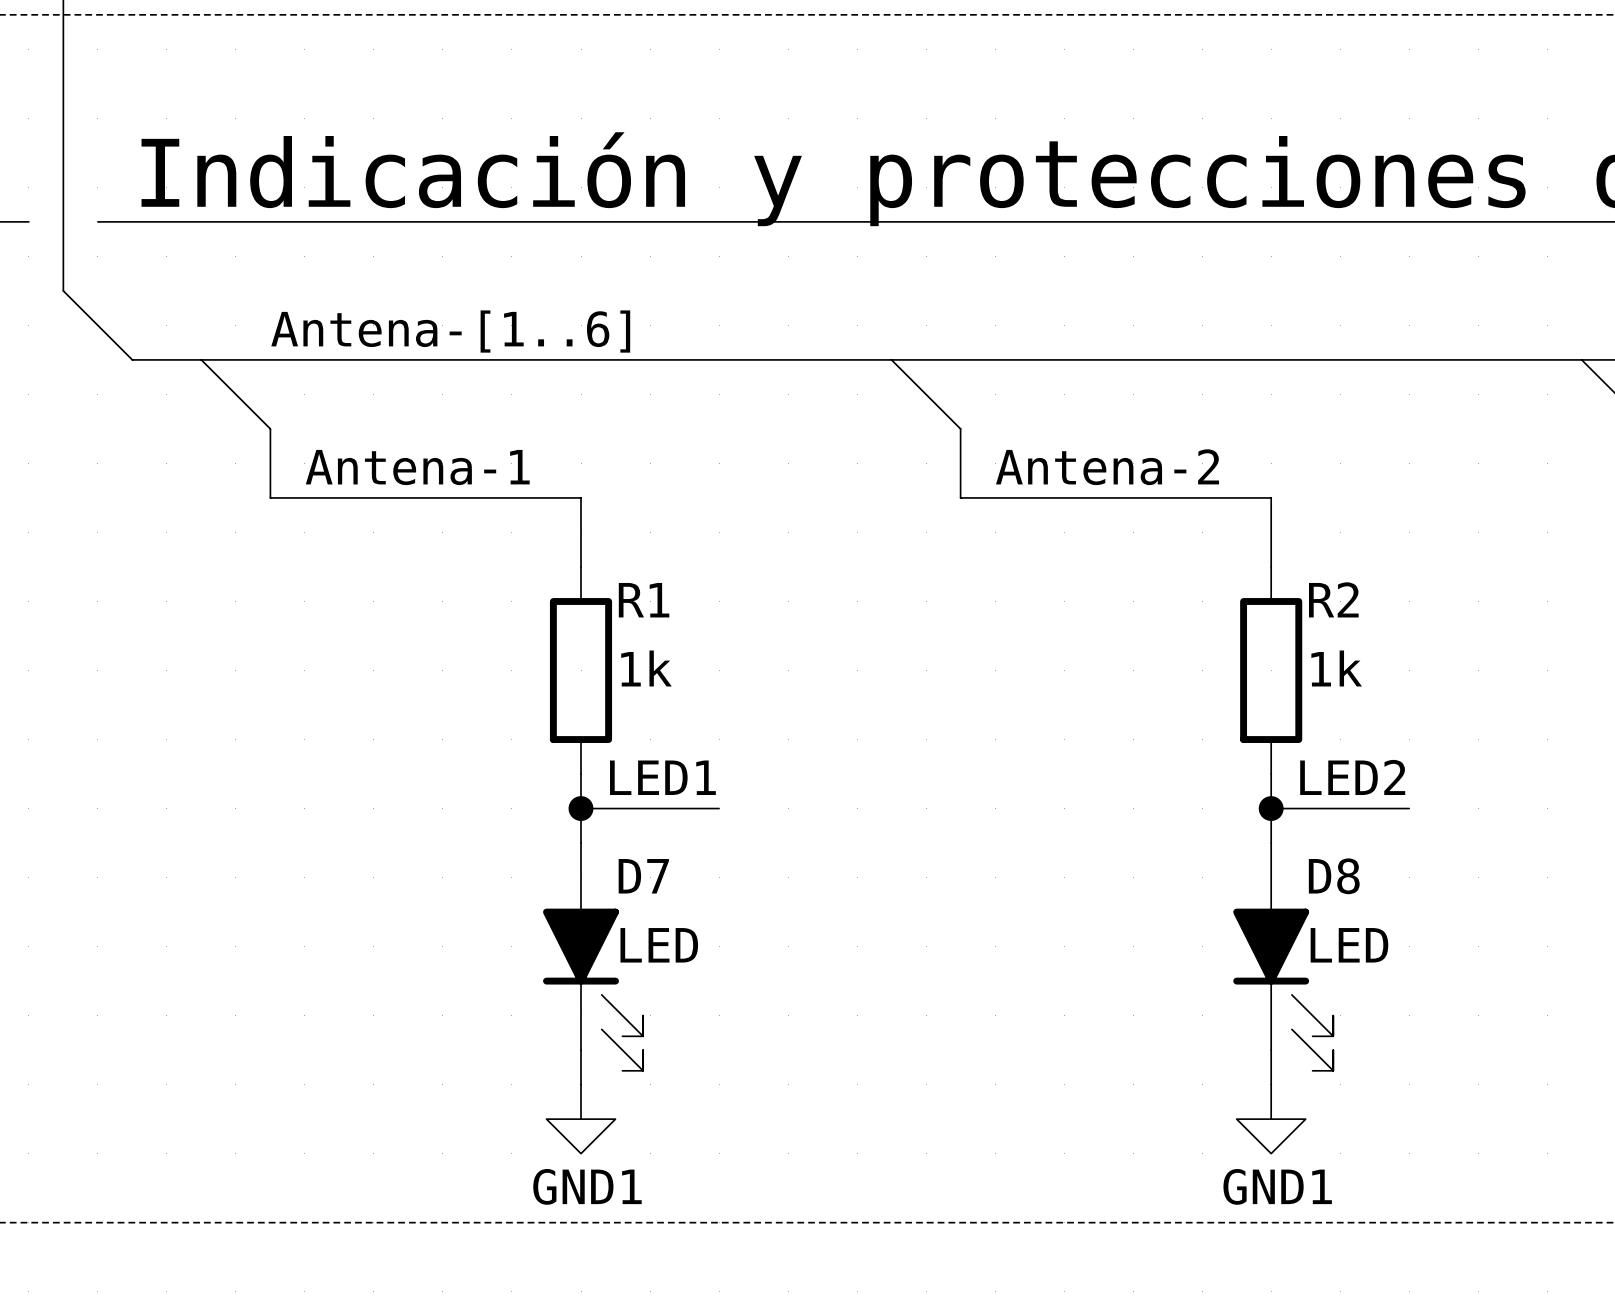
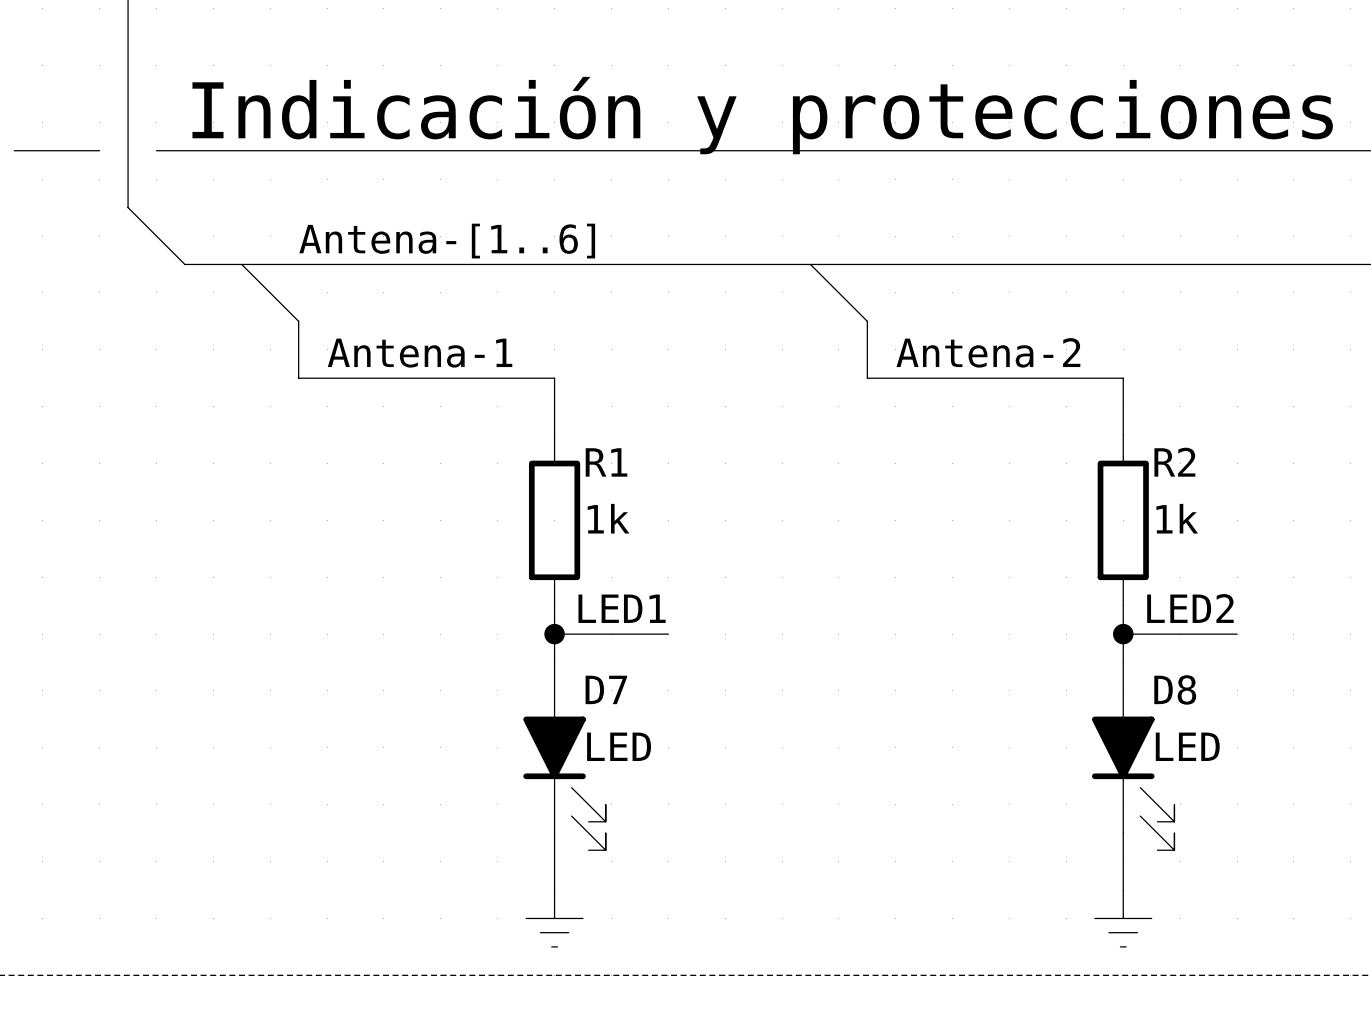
power symbol: GND1 (581, 1119) -> none
power symbol: GND1 (1271, 1119) -> none
power symbol: none -> (554, 918)
power symbol: none -> (1123, 918)

